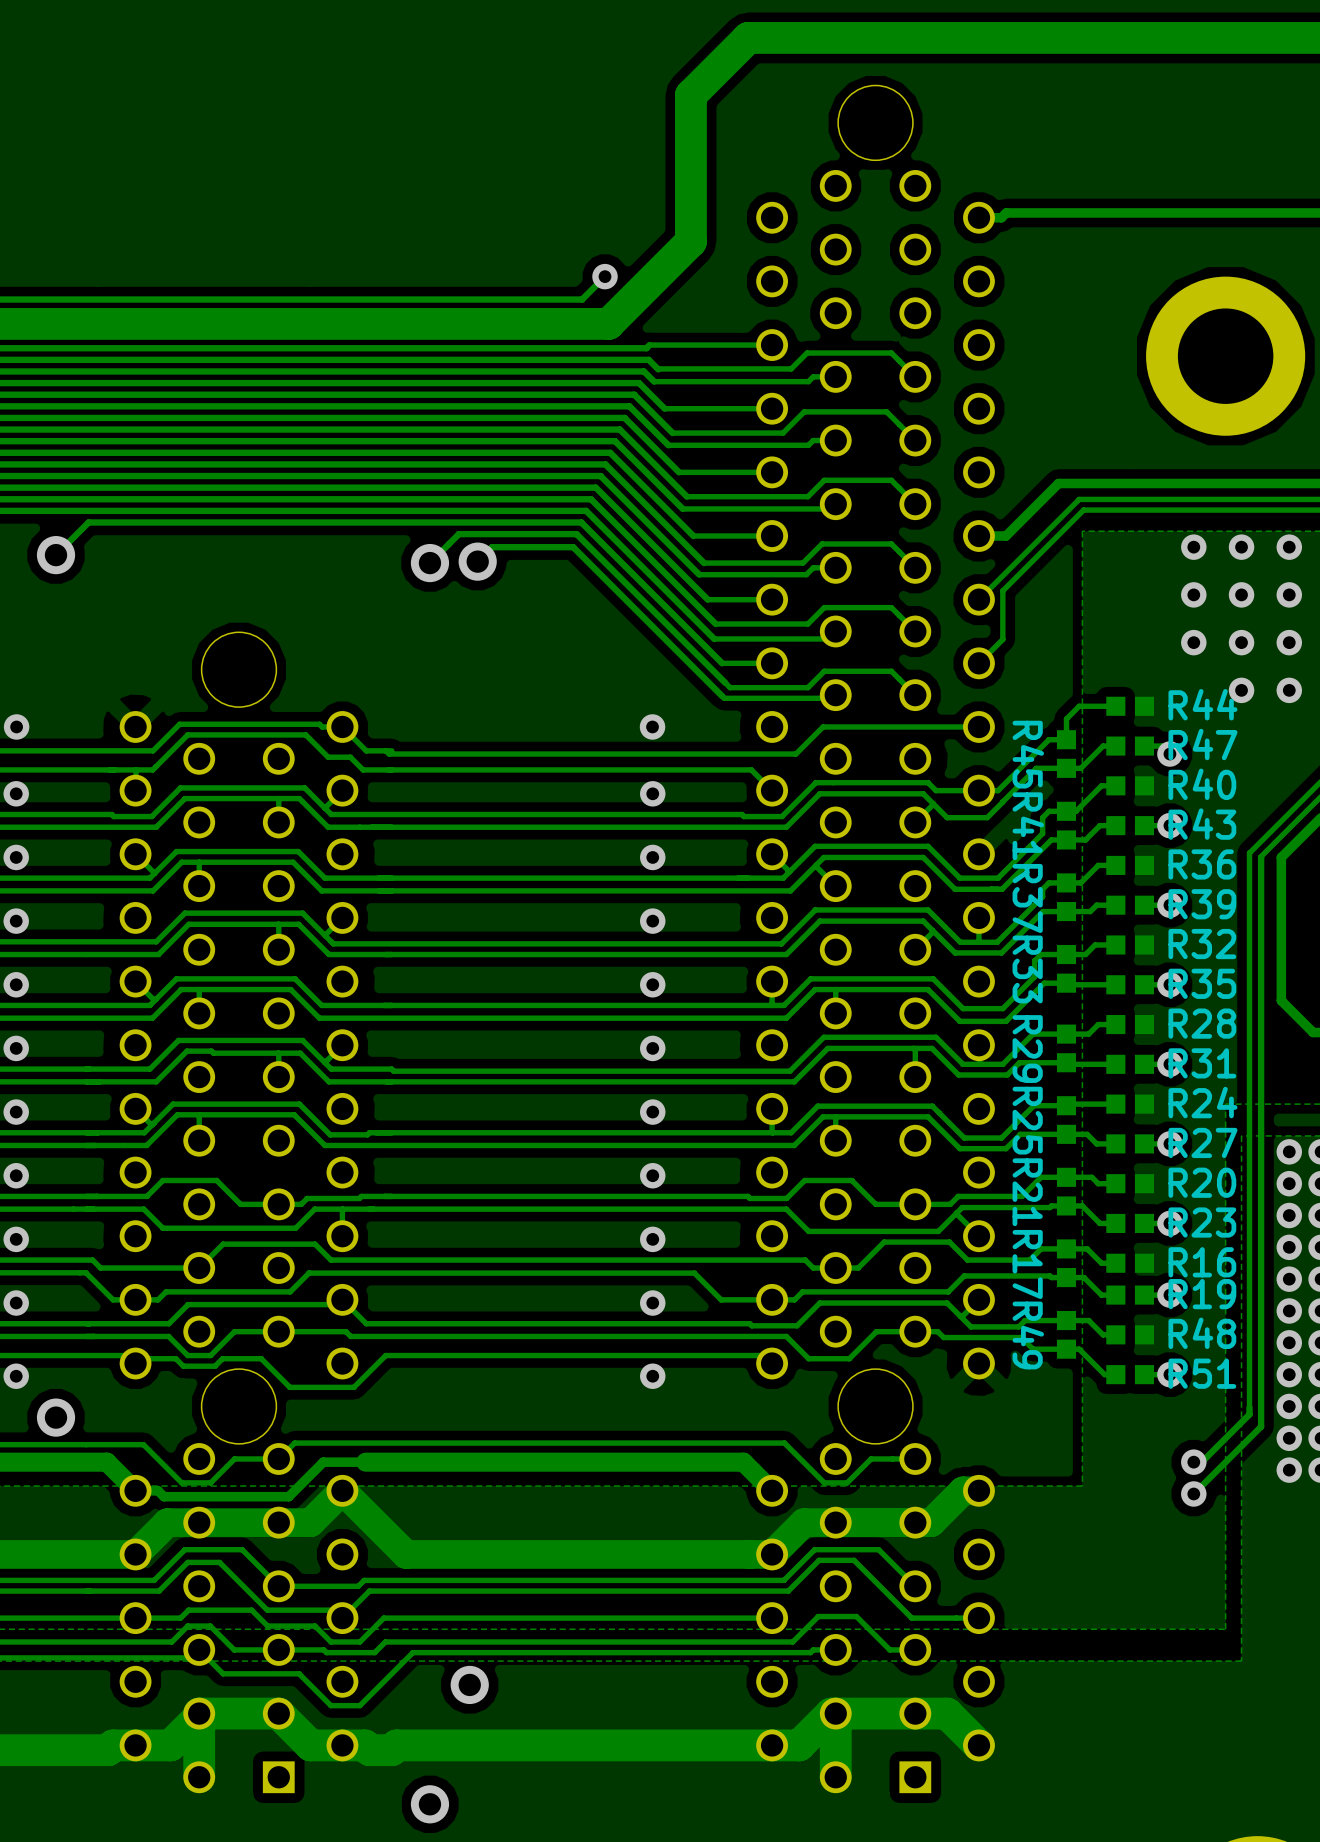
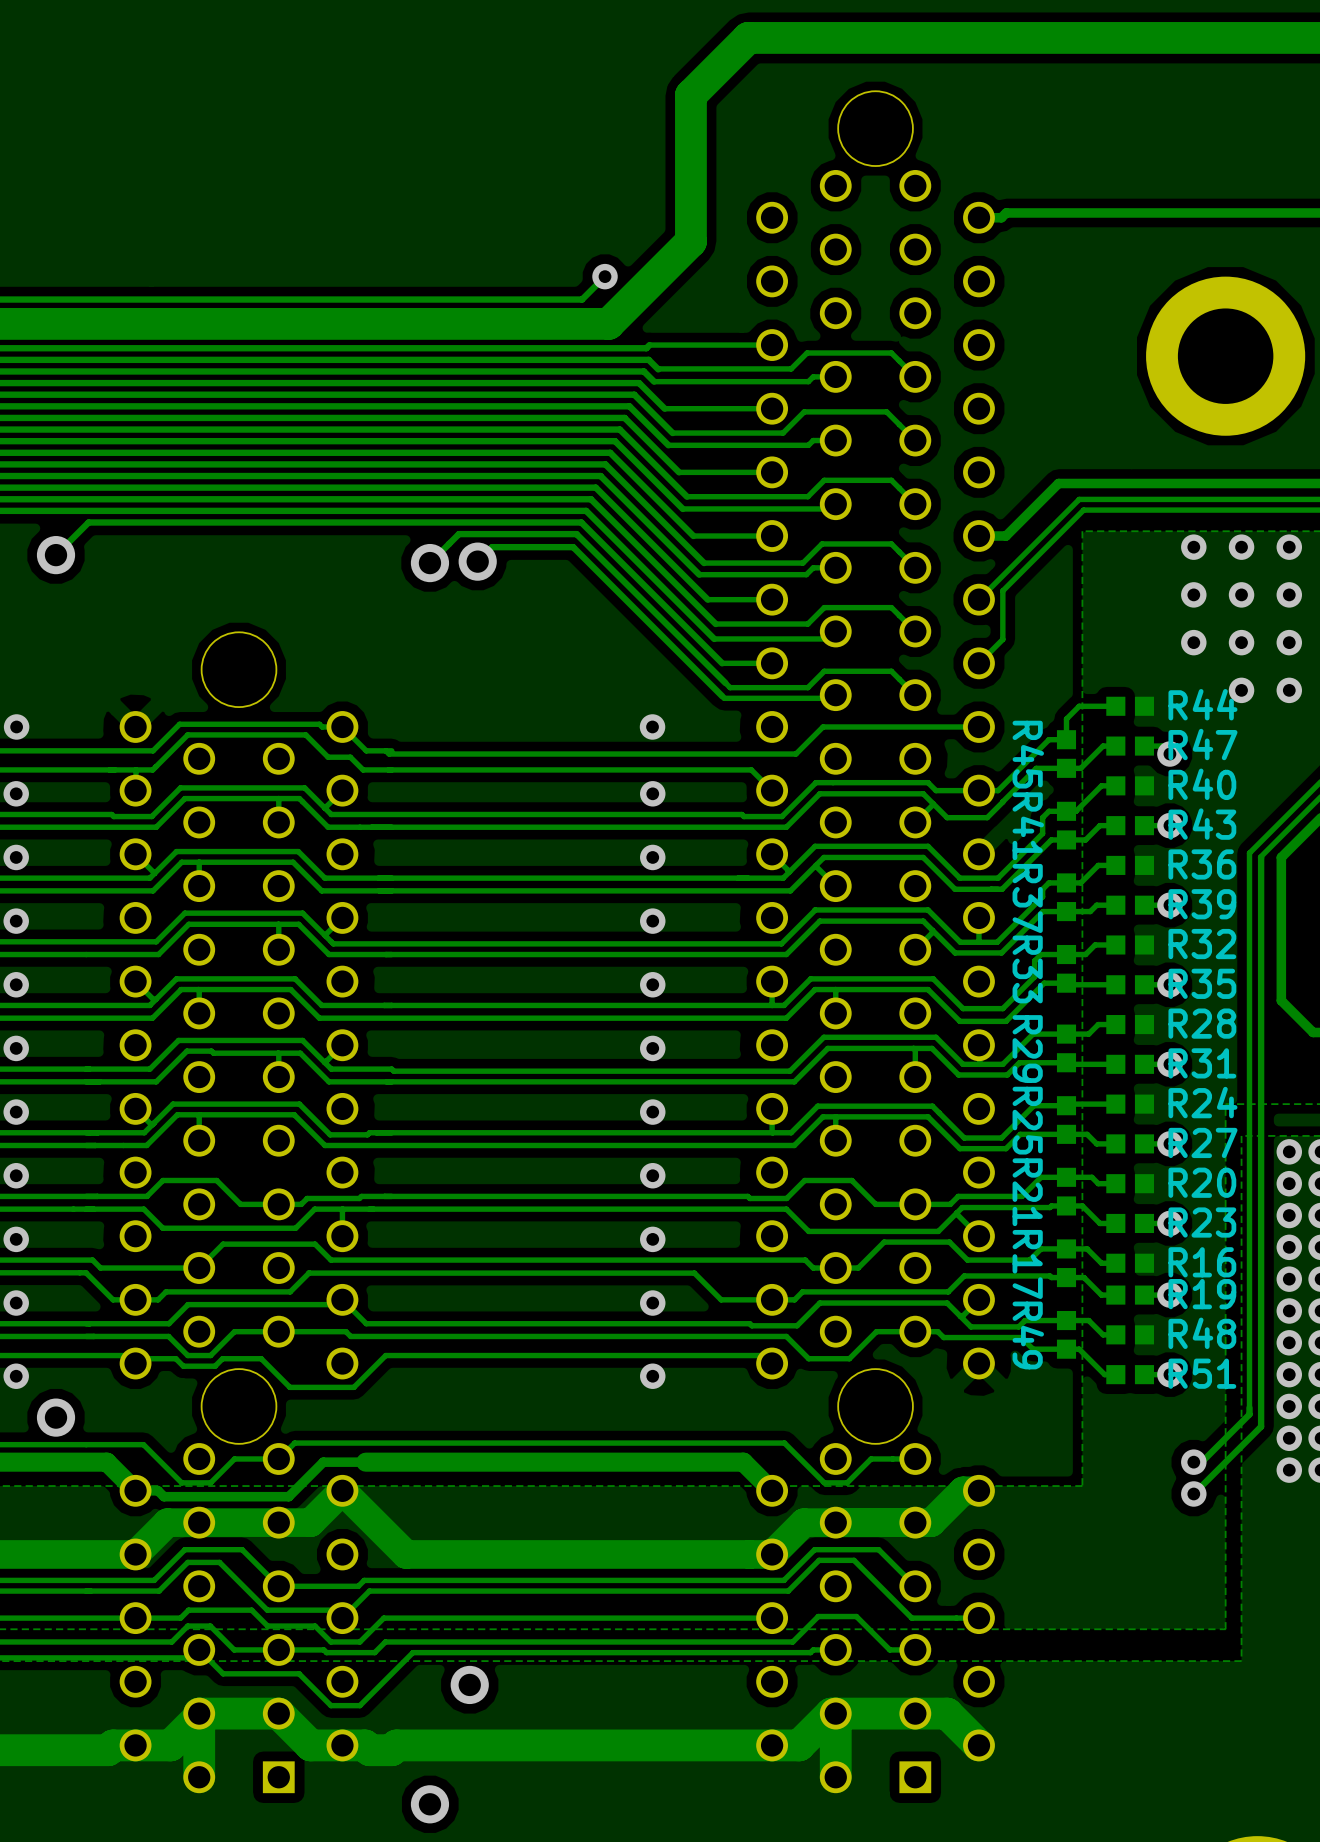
part footprint: [756, 85, 995, 1794] -> [756, 91, 995, 1794]

